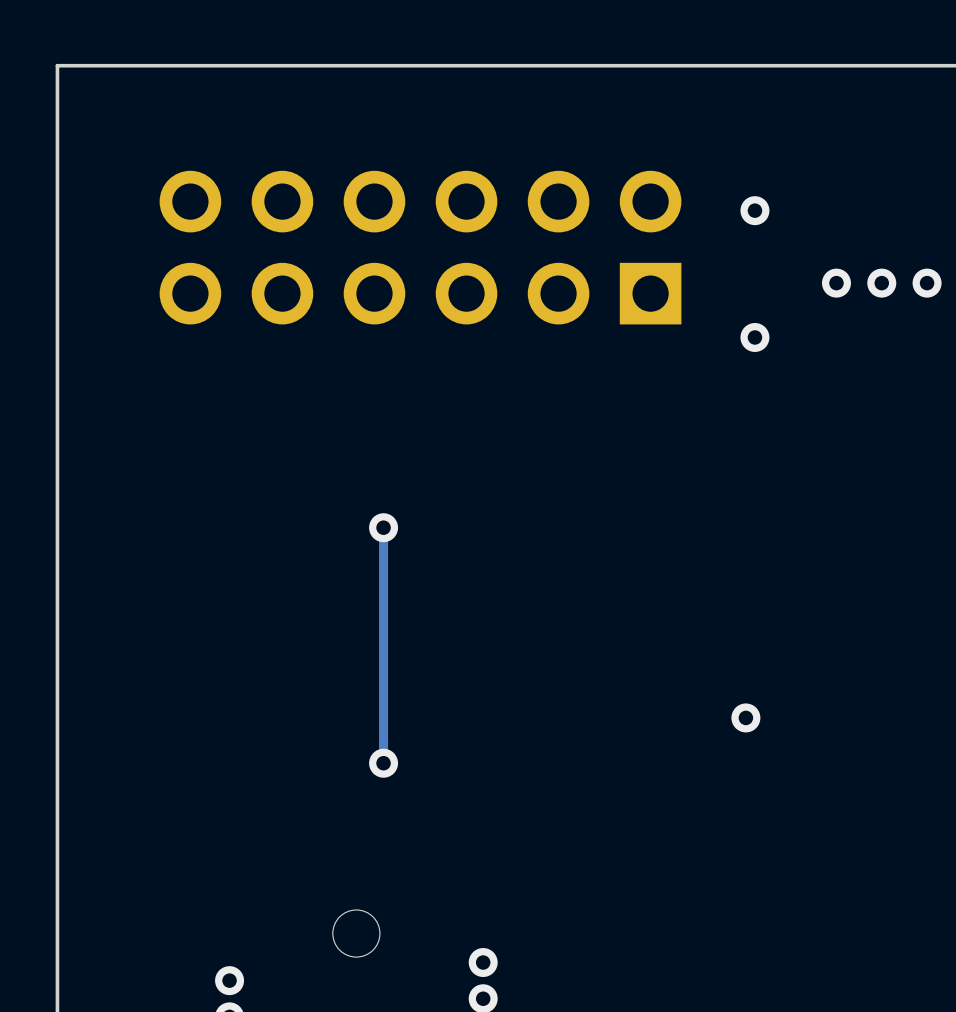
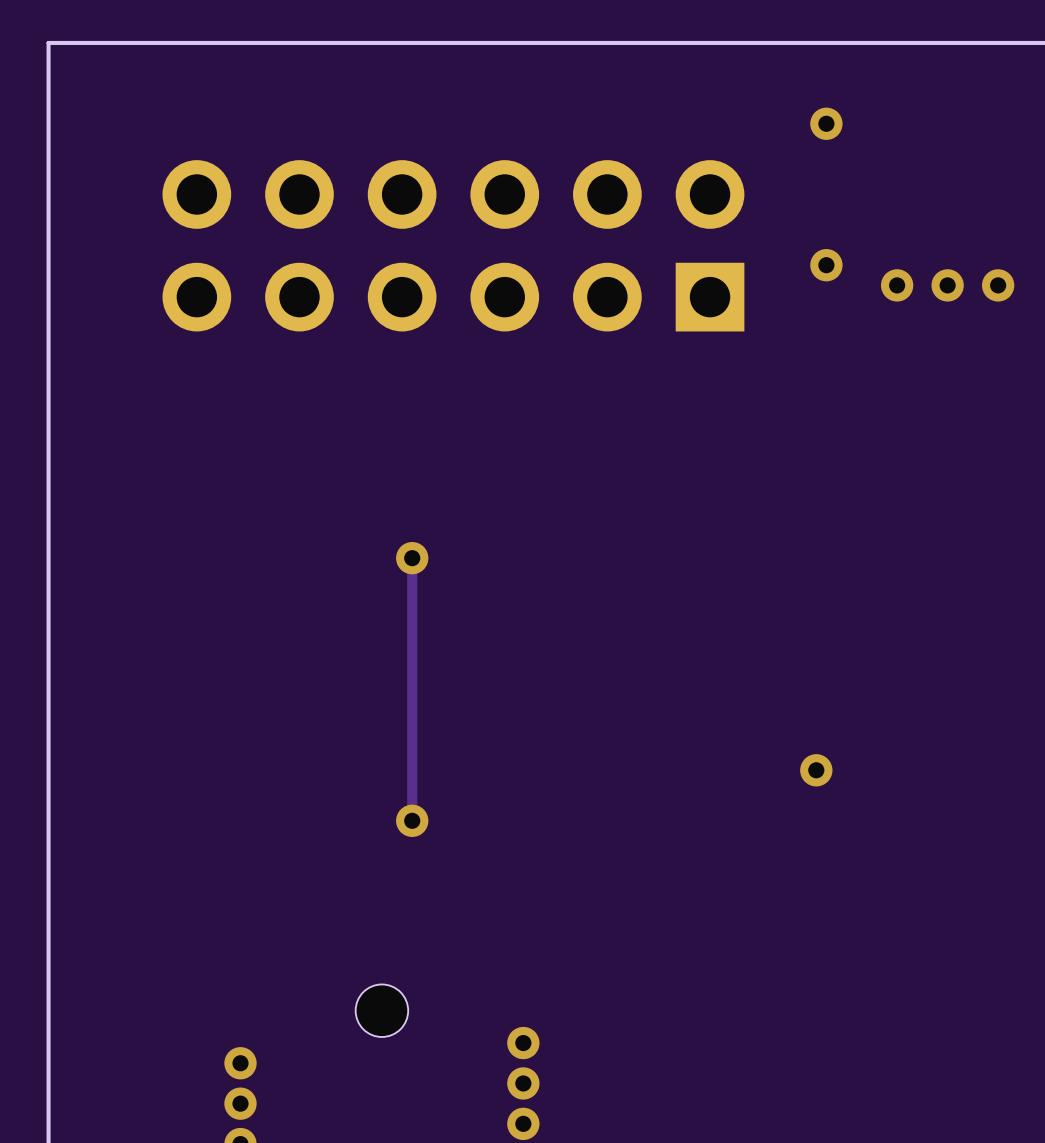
via: none -> (826, 123)
via: (754, 210) -> none
via: none -> (826, 265)
via: none -> (897, 285)
via: (836, 283) -> none
via: none -> (947, 285)
via: (881, 283) -> none
via: none -> (998, 285)
via: (927, 283) -> none
via: (754, 337) -> none

